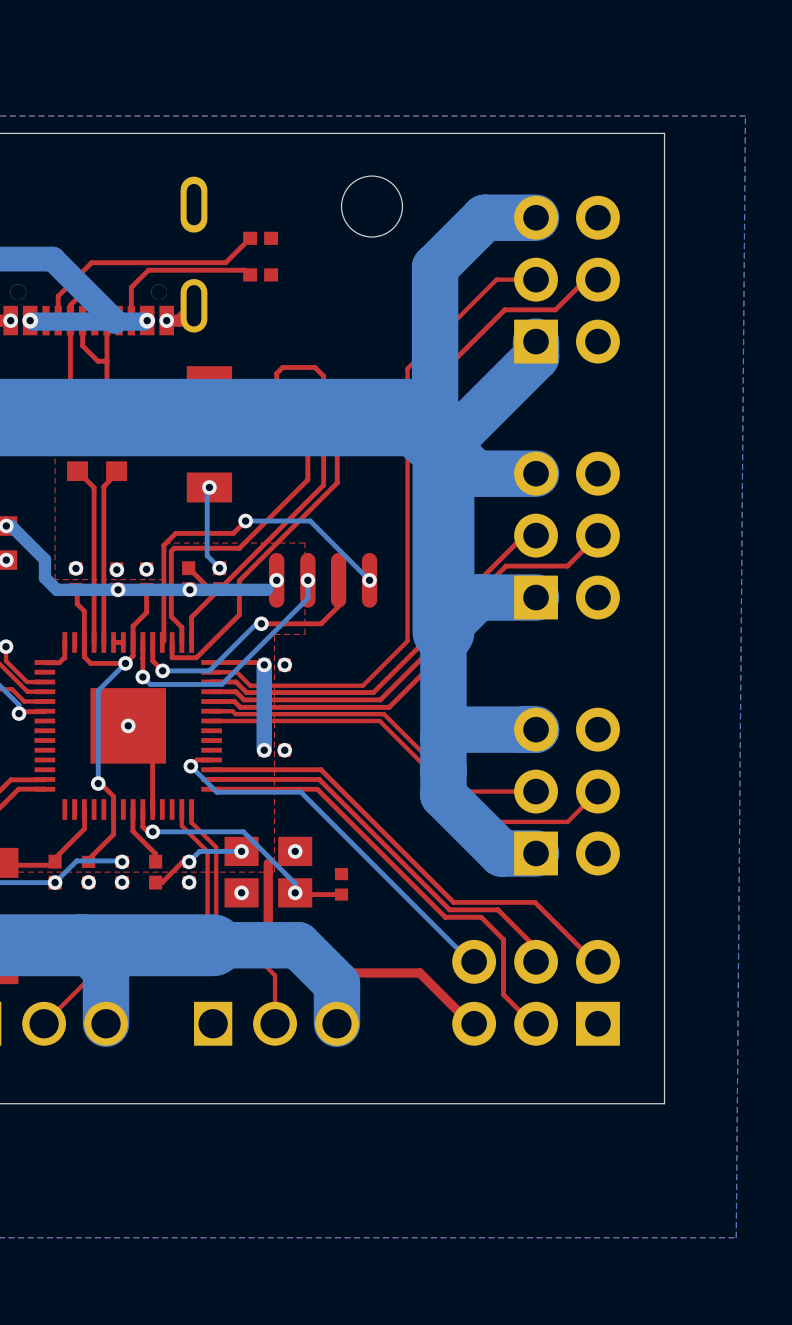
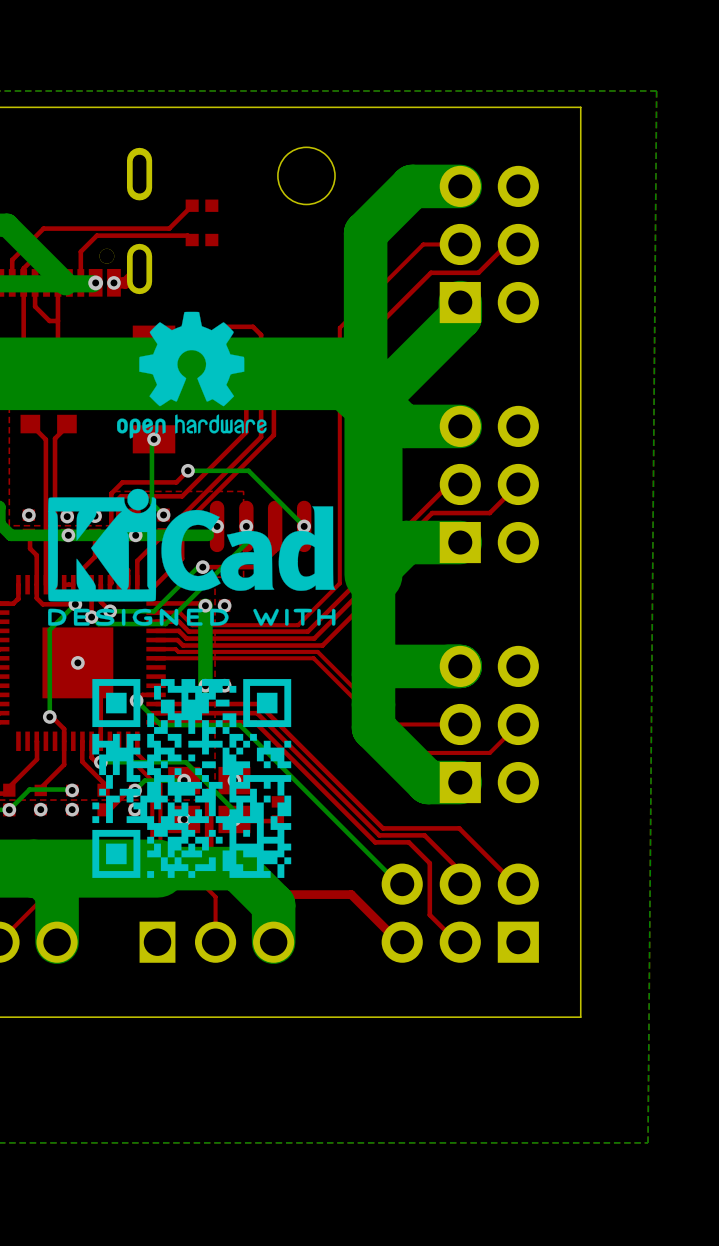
drawing: none -> [117, 311, 267, 439]
drawing: none -> [48, 488, 336, 626]
drawing: none -> [92, 679, 292, 878]

